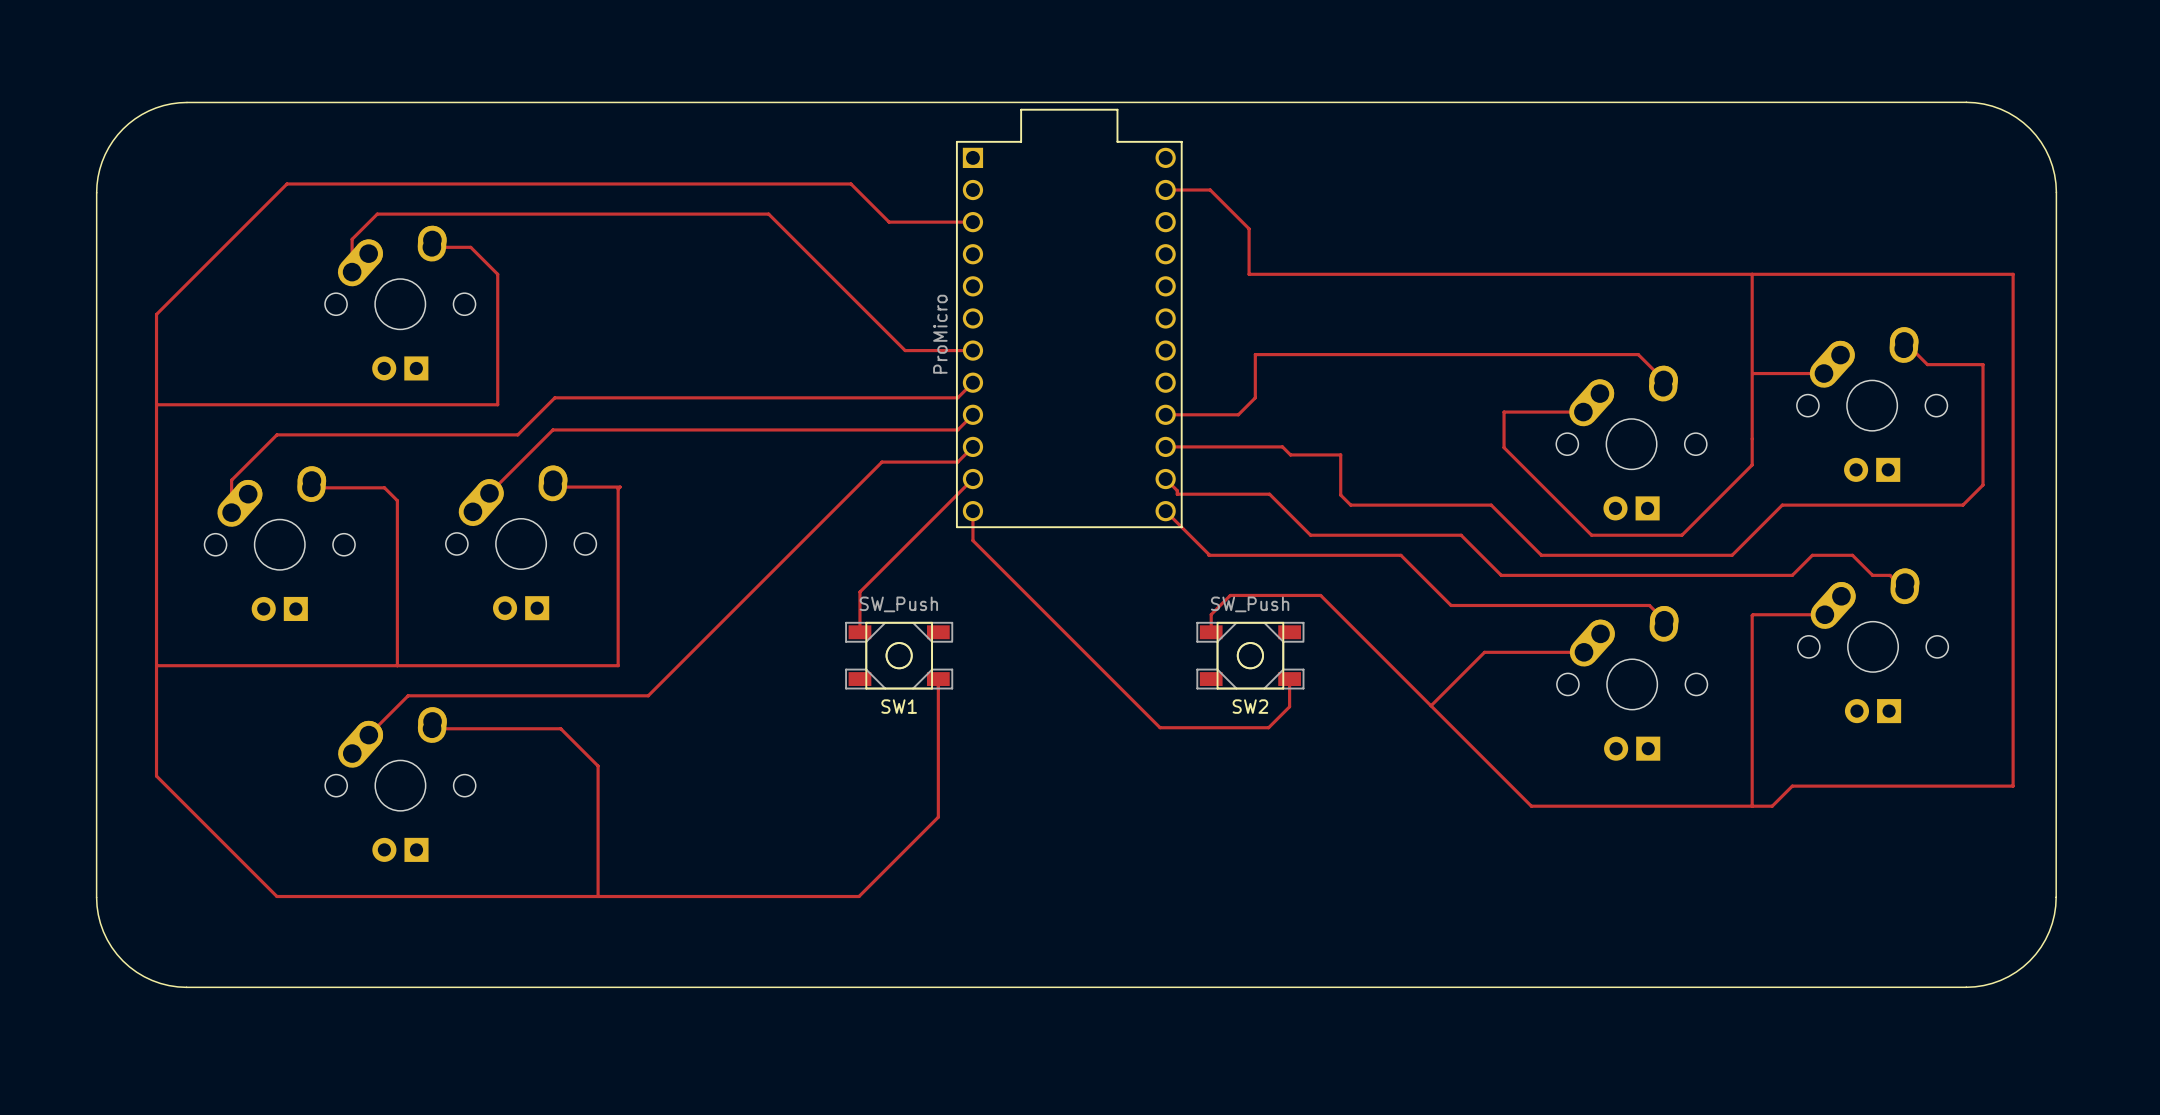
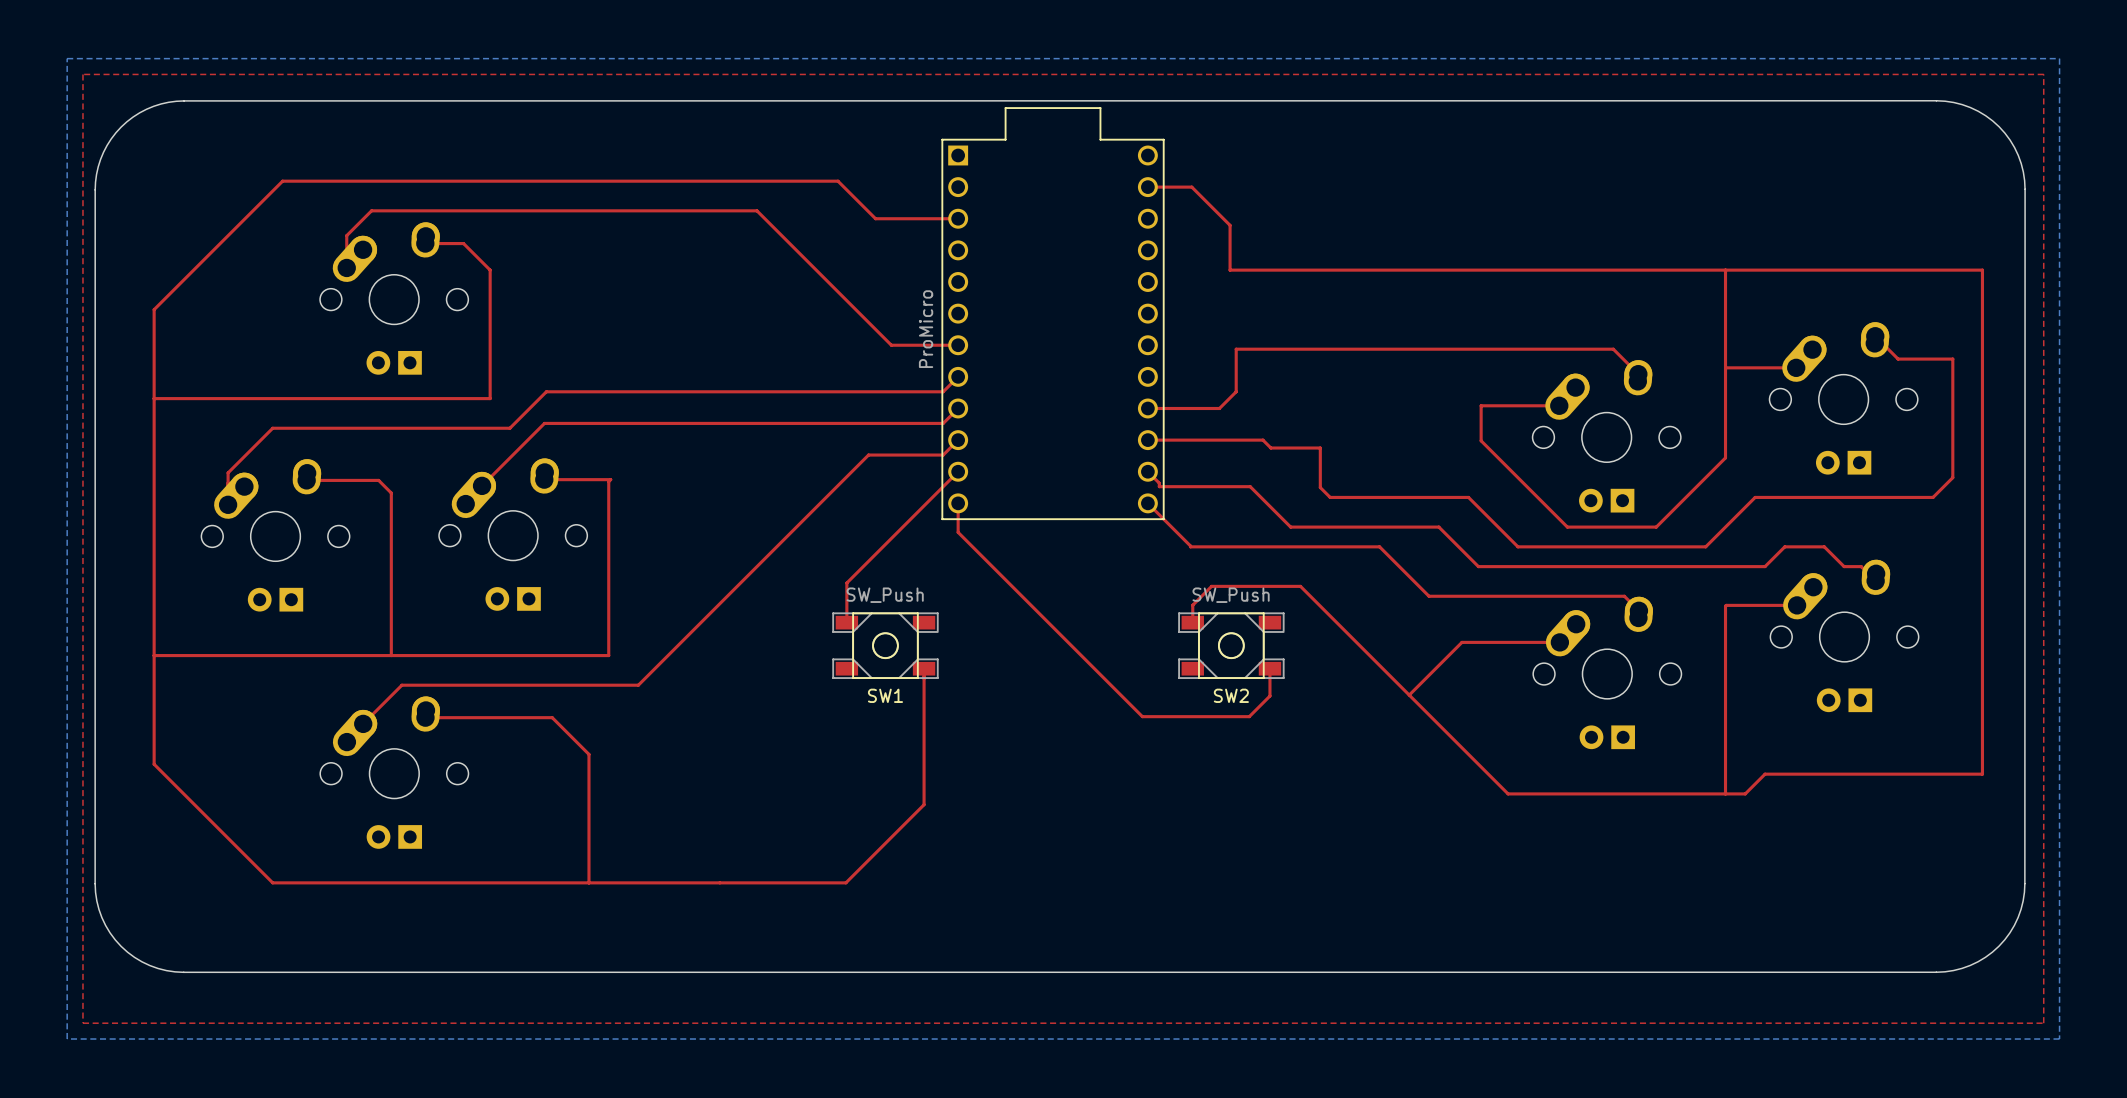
bottom zone outline: none -> (67, 58) (2059, 58) (2059, 1039) (67, 1039) (67, 58)
top zone outline: none -> (82, 74) (2043, 74) (2043, 1023) (82, 1023) (82, 74)
line: (1966, 102) (186, 102) (163, 105) (148, 110) (128, 123) (113, 141) (102, 161) (97, 184) (96, 897) (98, 914) (103, 931) (117, 954) (136, 972) (160, 983) (186, 987) (1966, 987) (1983, 985) (2000, 980) (2023, 966) (2041, 947) (2052, 923) (2055, 906) (2056, 192) (2054, 174) (2049, 157) (2041, 142) (2029, 128) (2016, 117) (2000, 109) (1983, 104) (1966, 102) -> none
board edge: none -> (183, 972) (166, 970) (149, 965) (134, 957) (121, 946) (110, 932) (101, 917) (96, 901) (95, 883) (95, 182) (100, 159) (111, 138) (126, 121) (146, 109) (161, 103) (184, 100) (1936, 100) (1962, 104) (1985, 115) (2004, 133) (2018, 155) (2023, 172) (2025, 189) (2024, 892) (2021, 909) (2009, 932) (1992, 952) (1970, 965) (1953, 970) (1936, 972) (183, 972)

